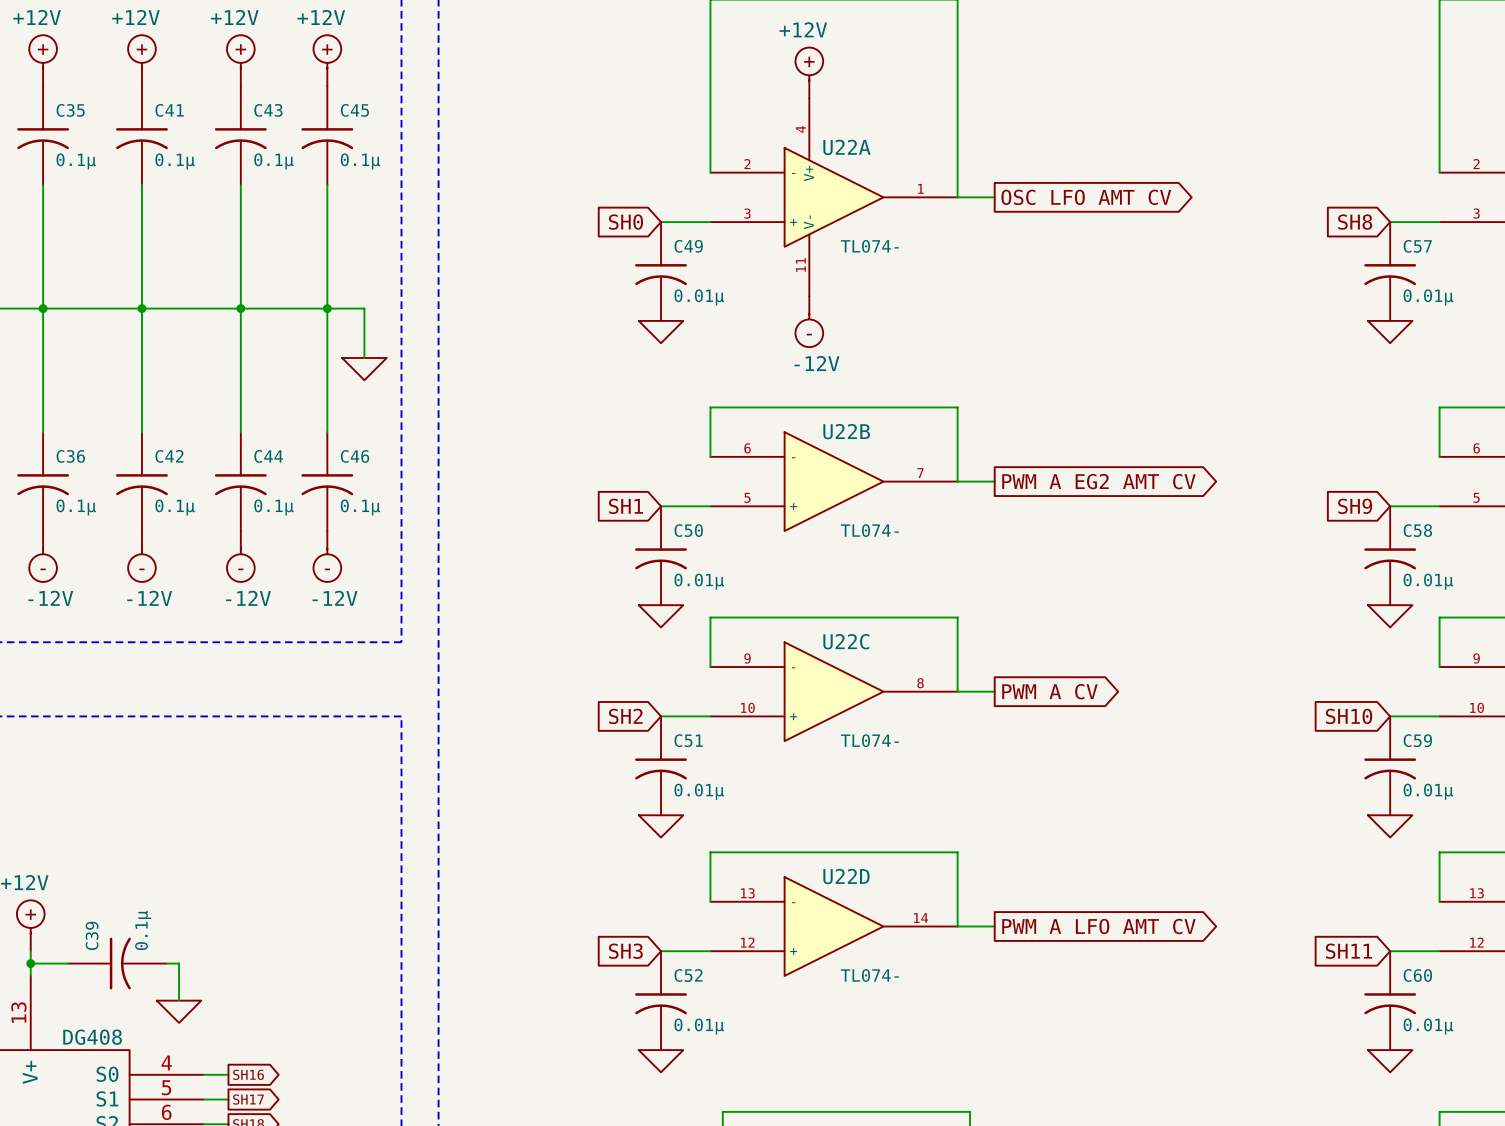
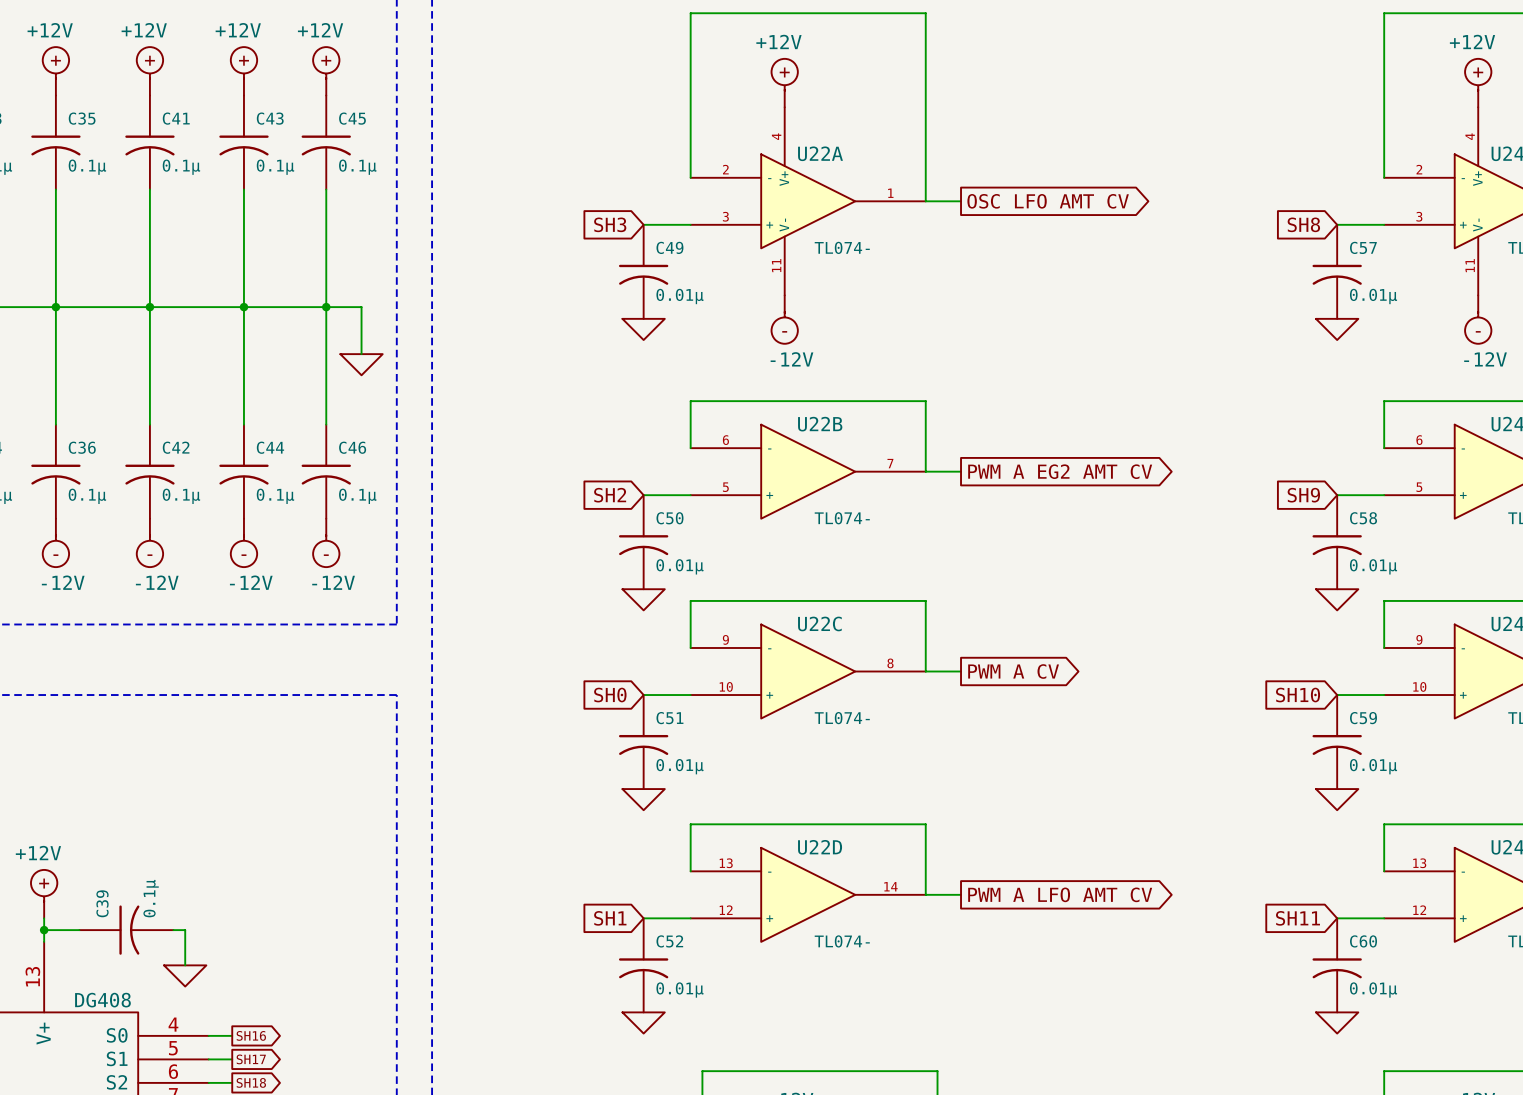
global label: SH0 (625, 222) -> SH3 (610, 224)
global label: SH1 (625, 506) -> SH2 (610, 495)
global label: SH2 (625, 716) -> SH0 (610, 695)
global label: SH3 (625, 951) -> SH1 (610, 918)

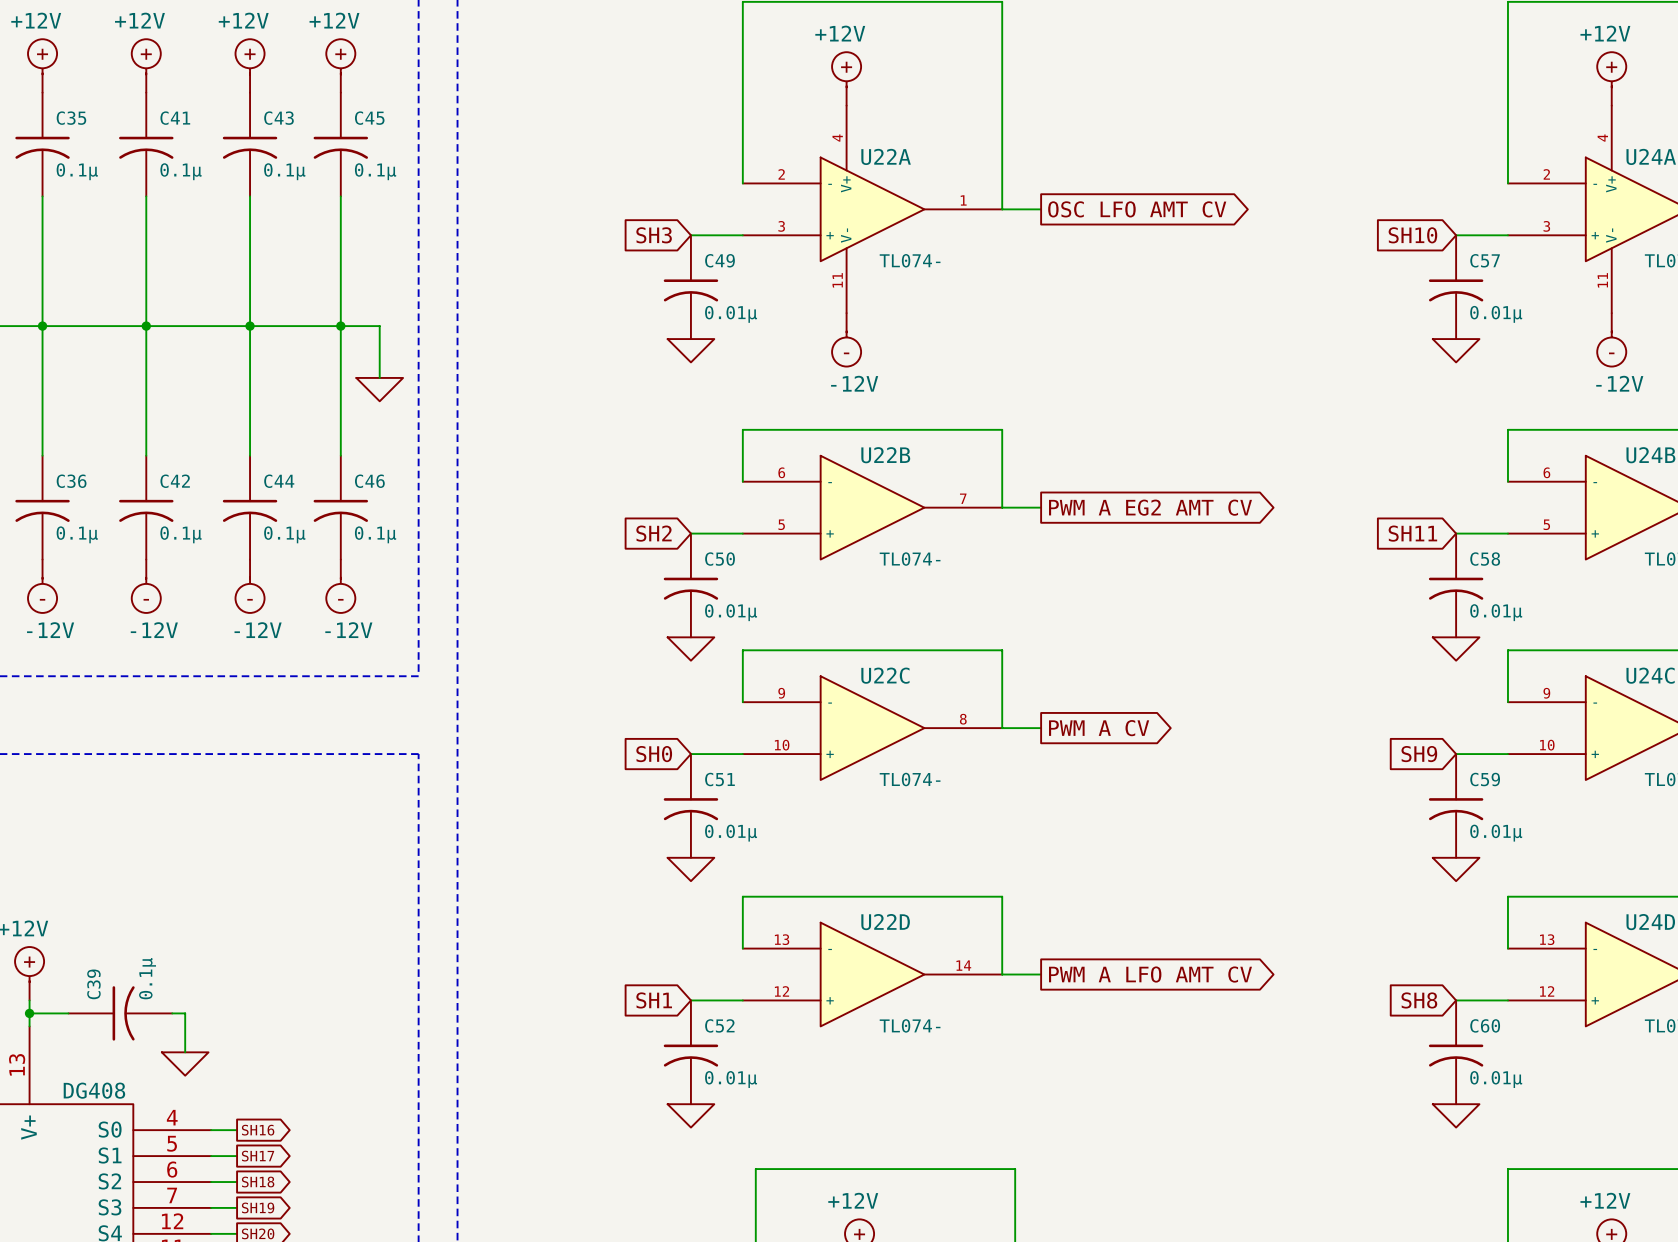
global label: SH8 (1303, 224) -> SH10 (1412, 235)
global label: SH9 (1303, 495) -> SH11 (1412, 533)
global label: SH10 (1298, 695) -> SH9 (1419, 754)
global label: SH11 (1298, 918) -> SH8 (1419, 1000)

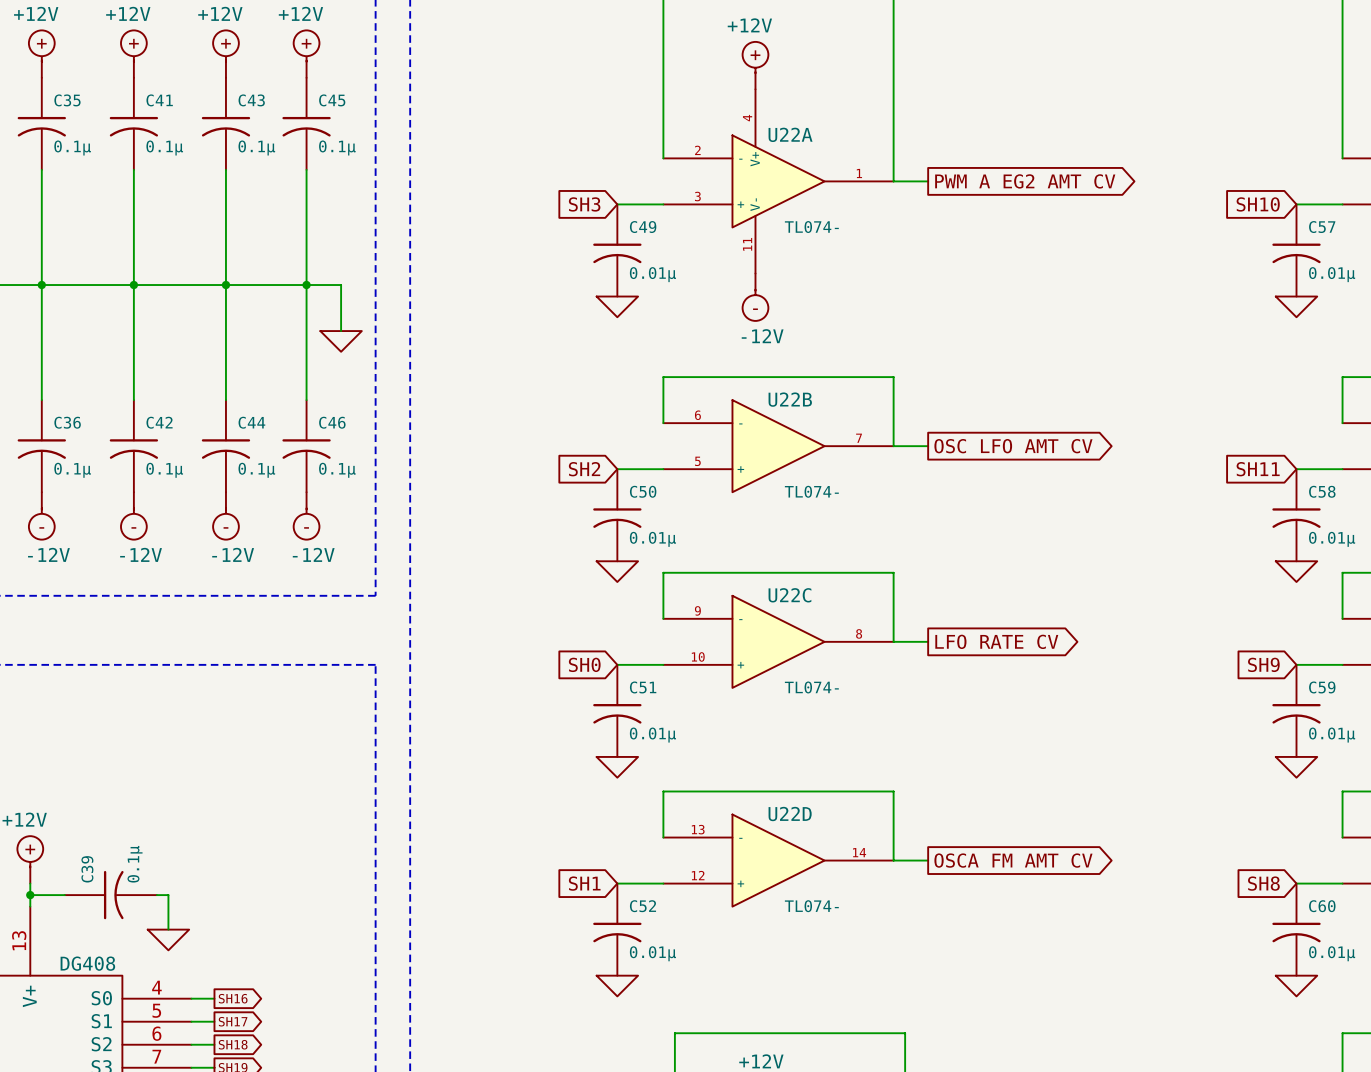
global label: OSC LFO AMT CV (1137, 209) -> PWM A EG2 AMT CV (1025, 181)
global label: PWM A EG2 AMT CV (1150, 507) -> OSC LFO AMT CV (1013, 446)
global label: PWM A CV (1099, 728) -> LFO RATE CV (996, 641)
global label: PWM A LFO AMT CV (1150, 974) -> OSCA FM AMT CV (1013, 860)

